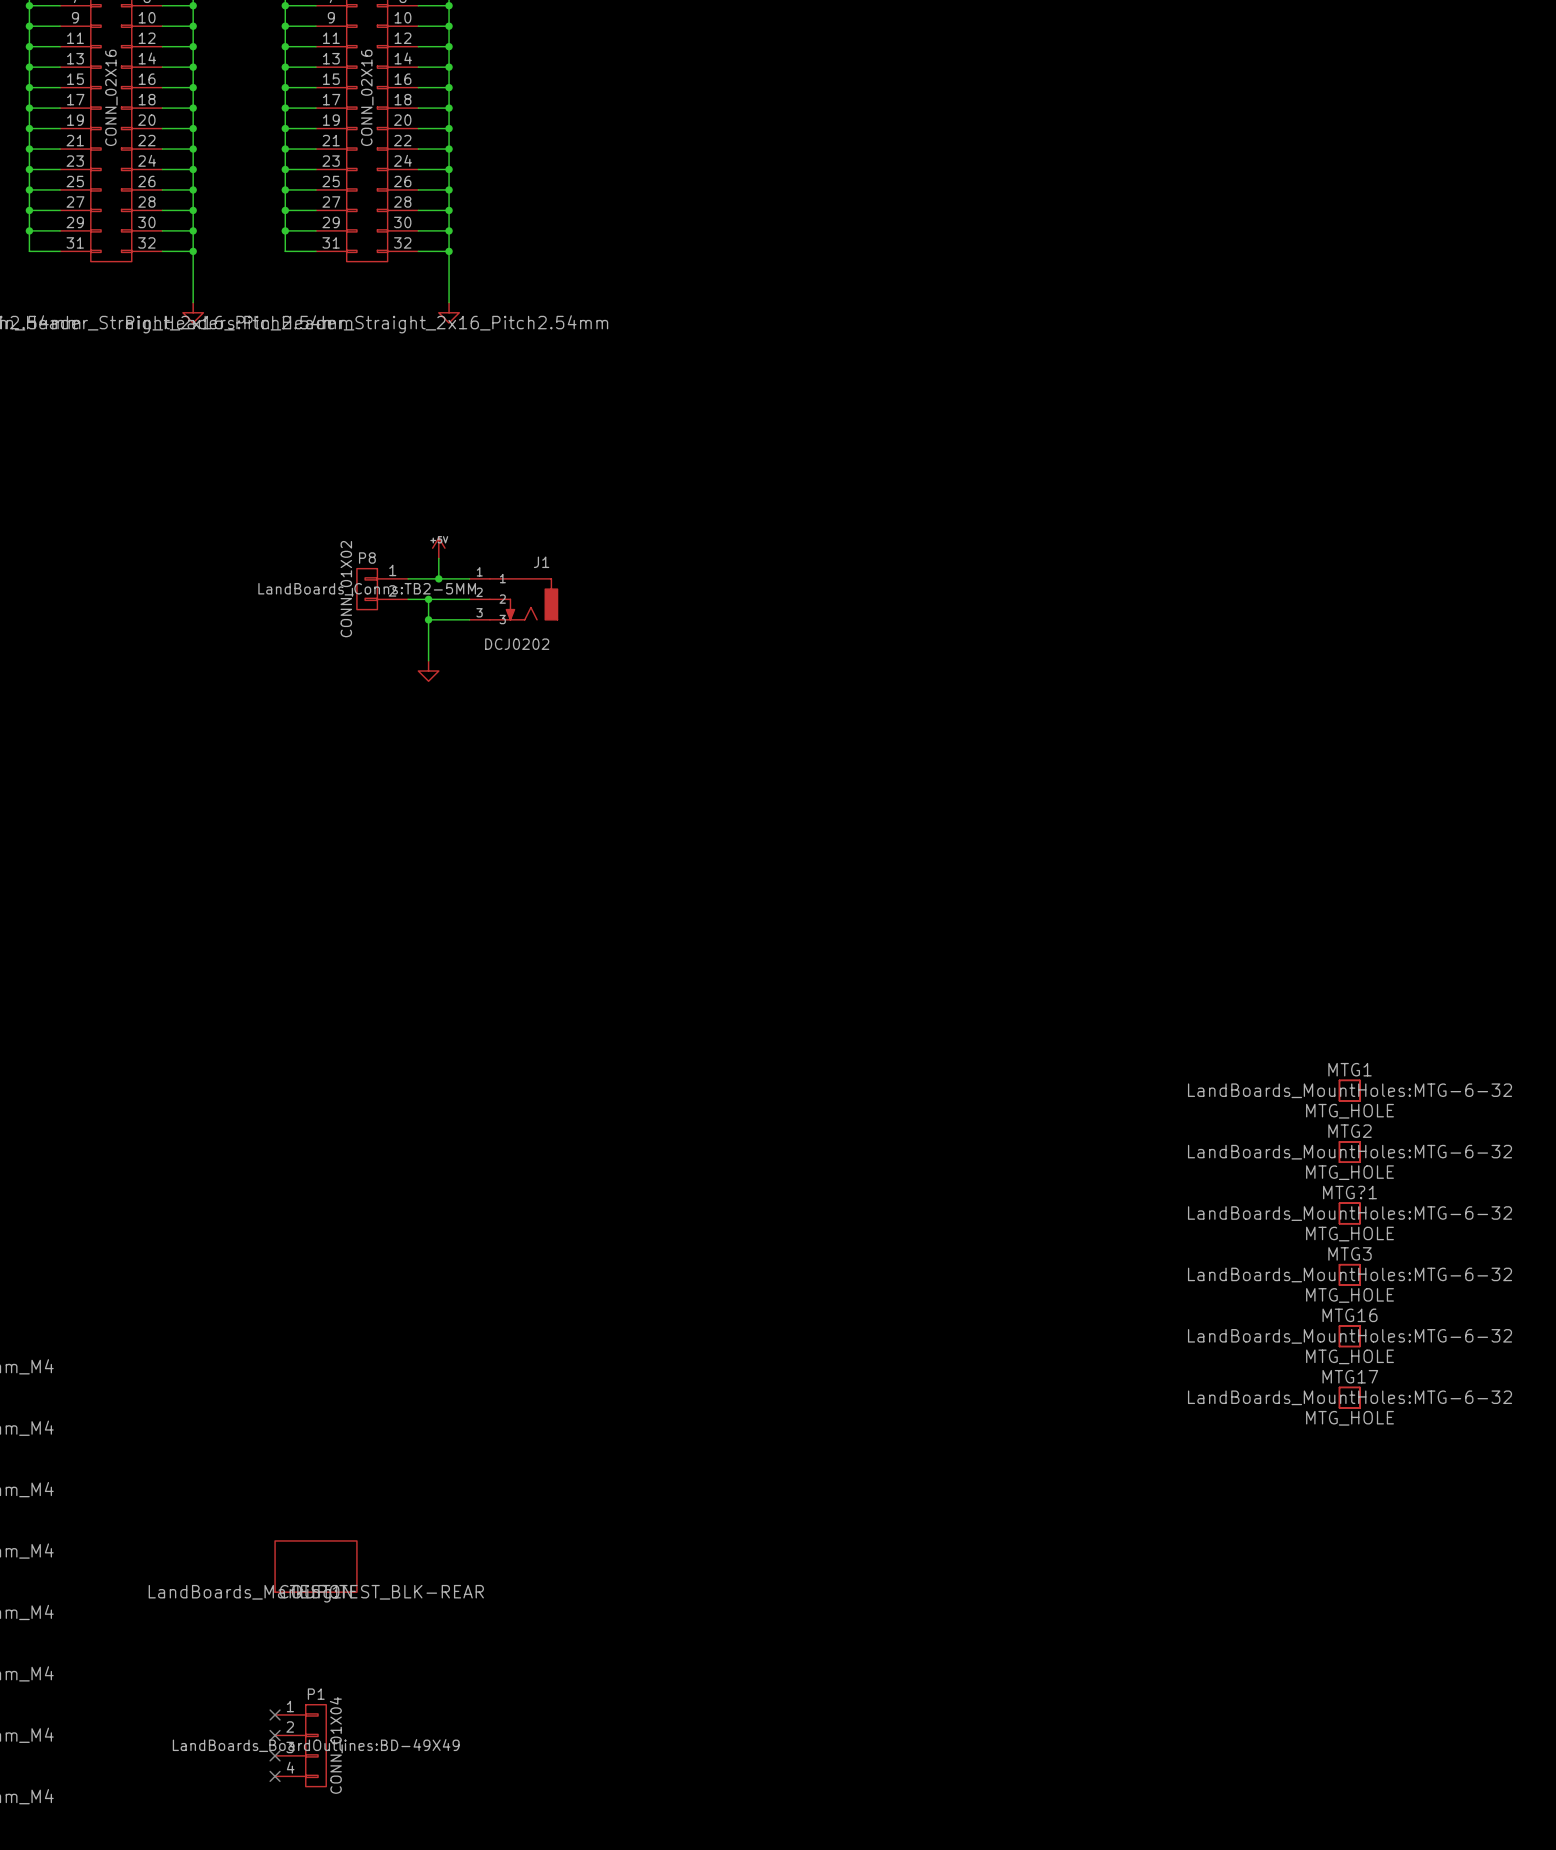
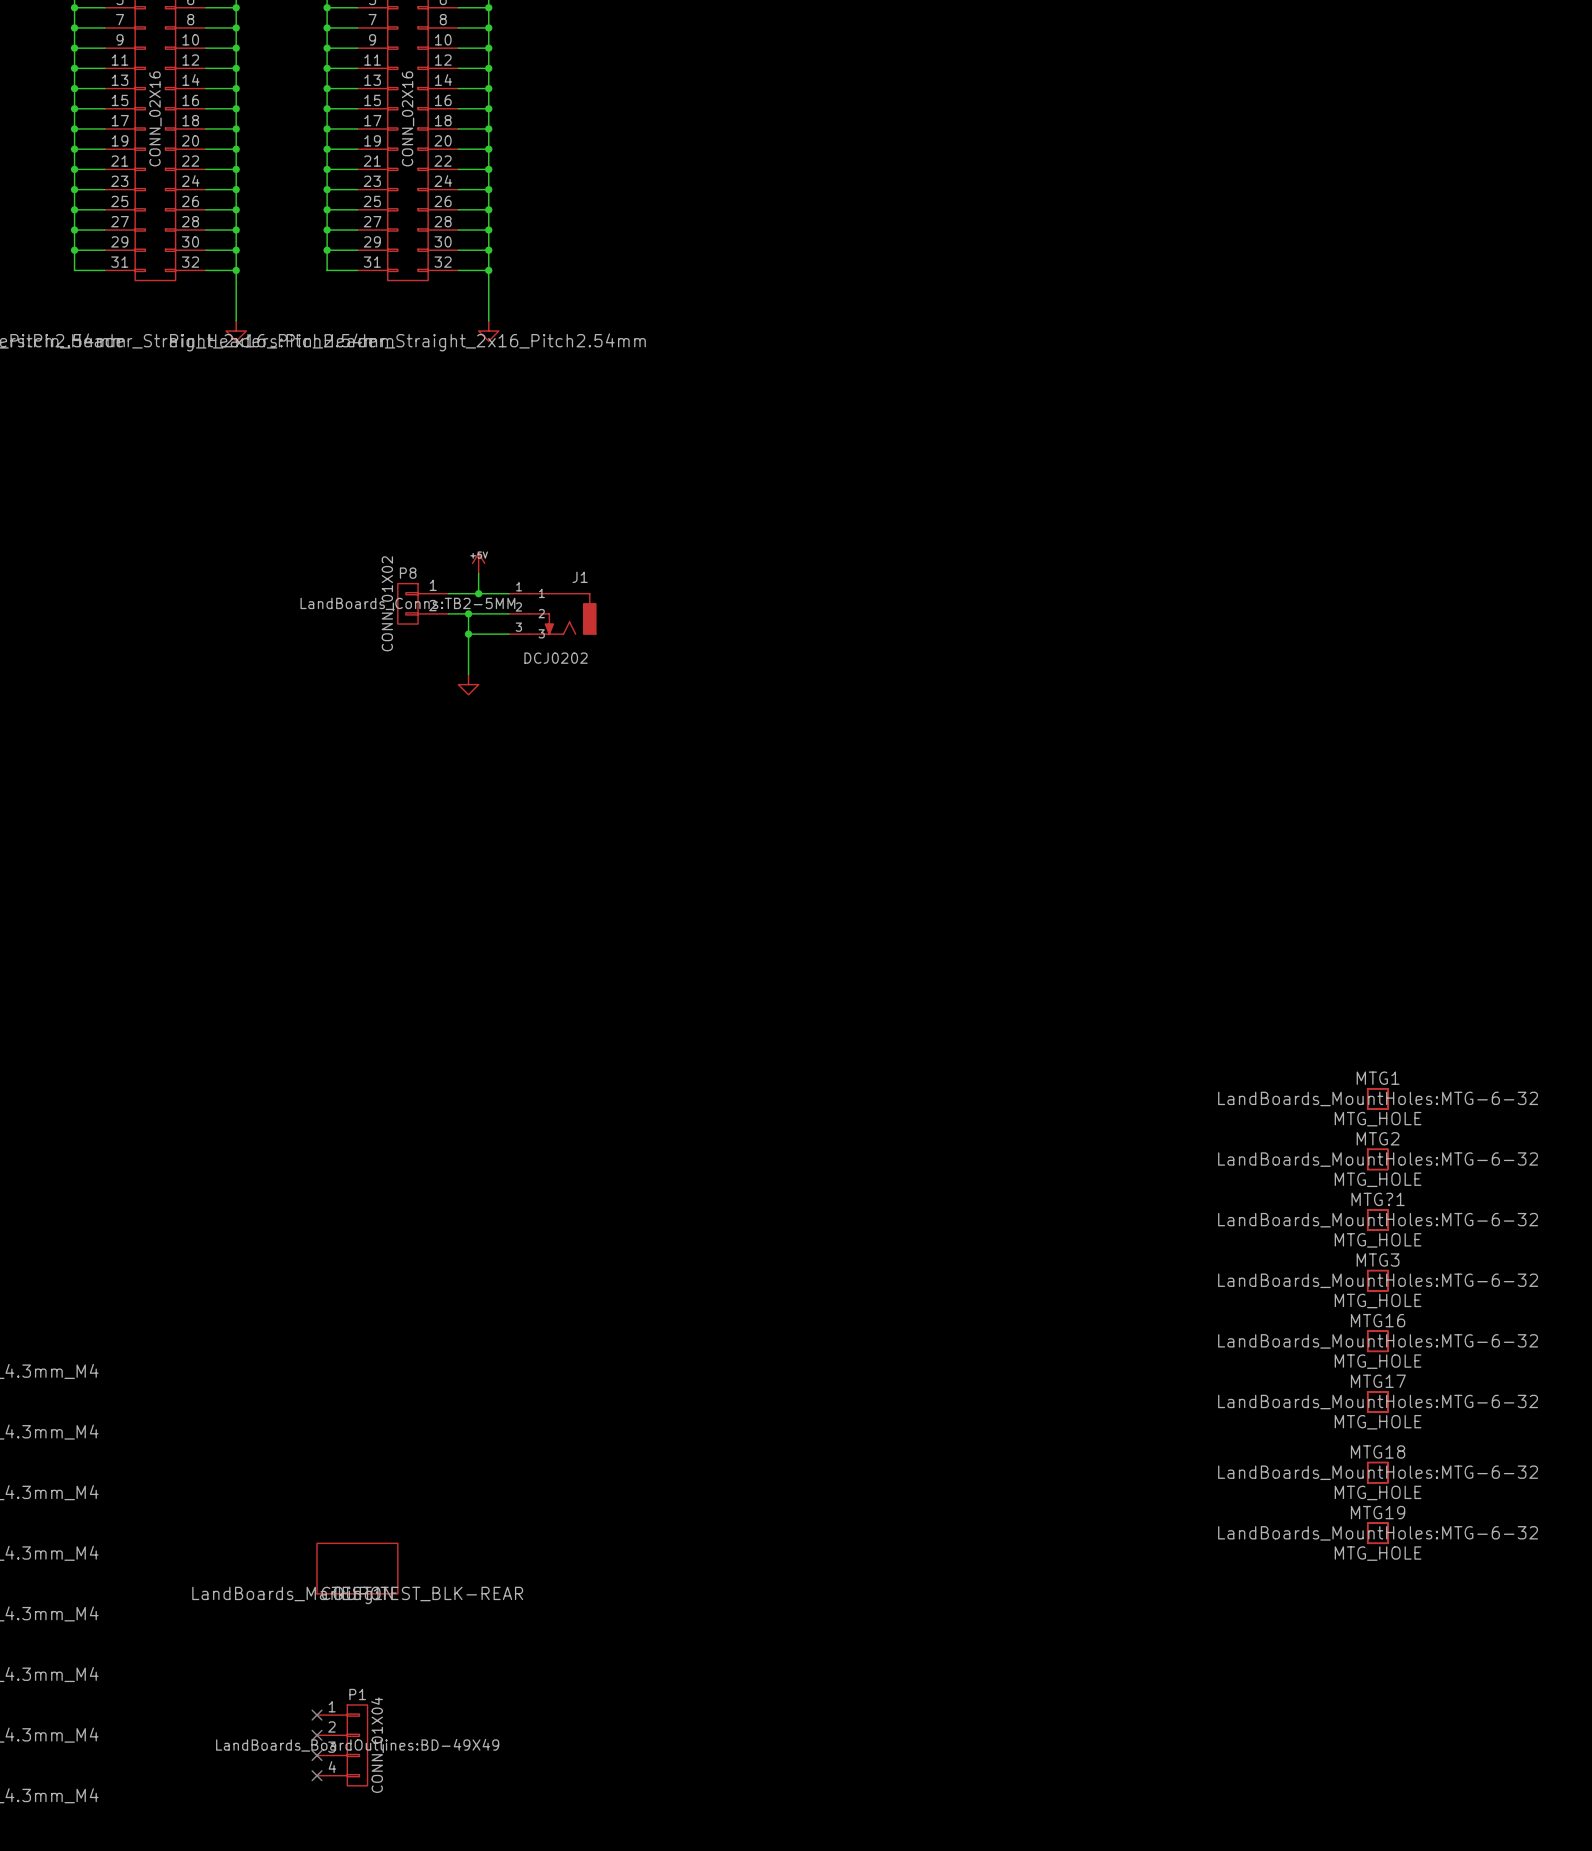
MTG18: none -> MTG_HOLE (1377, 1472)
MTG19: none -> MTG_HOLE (1377, 1533)

